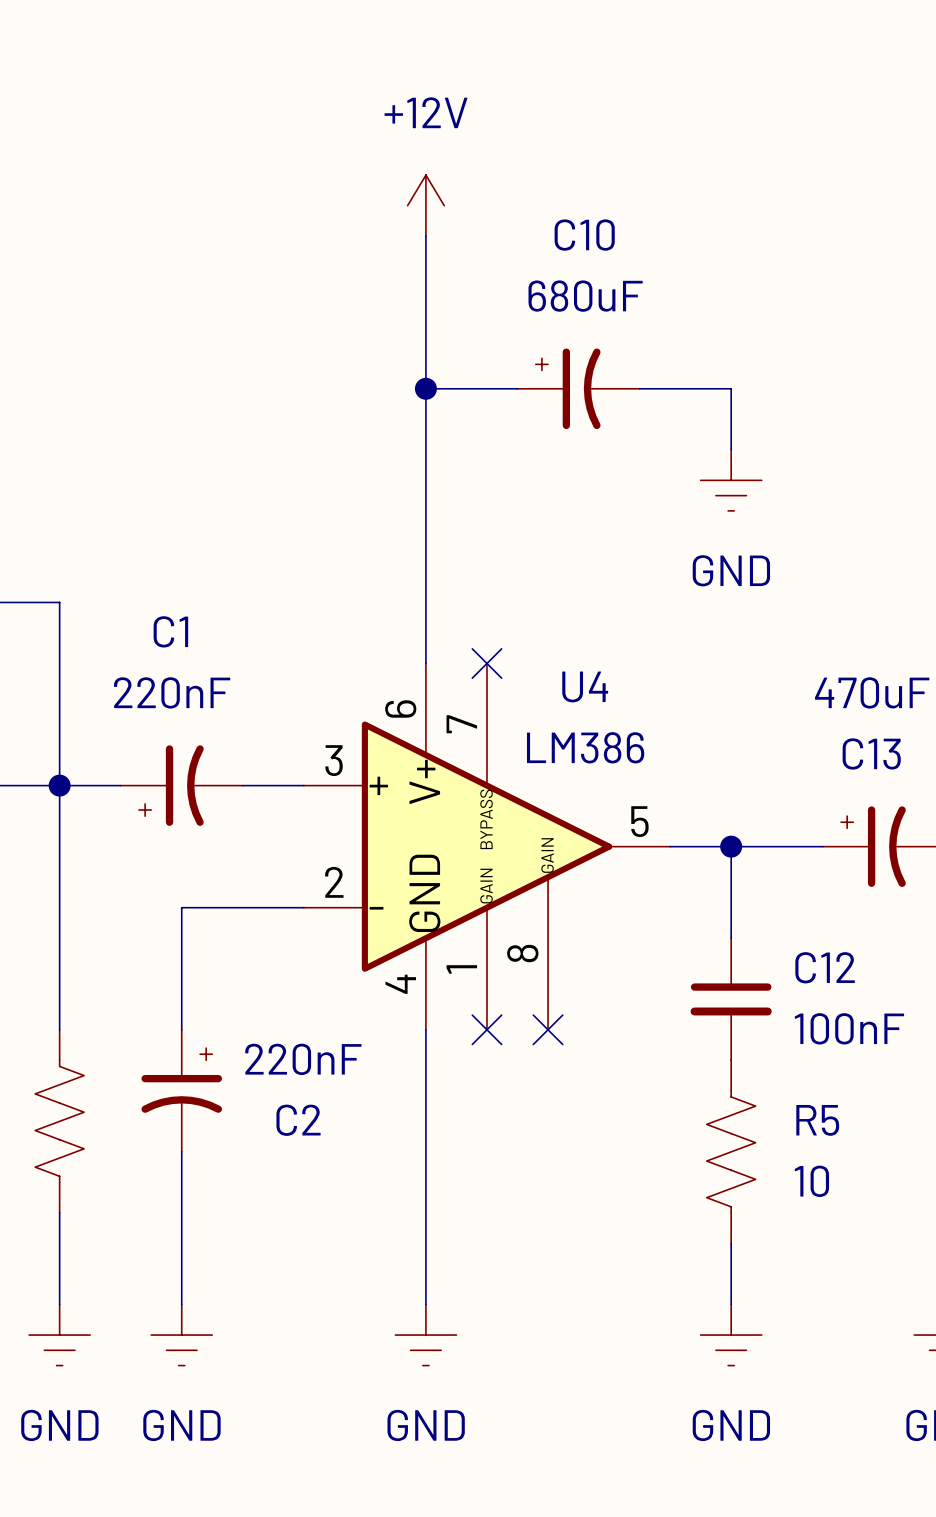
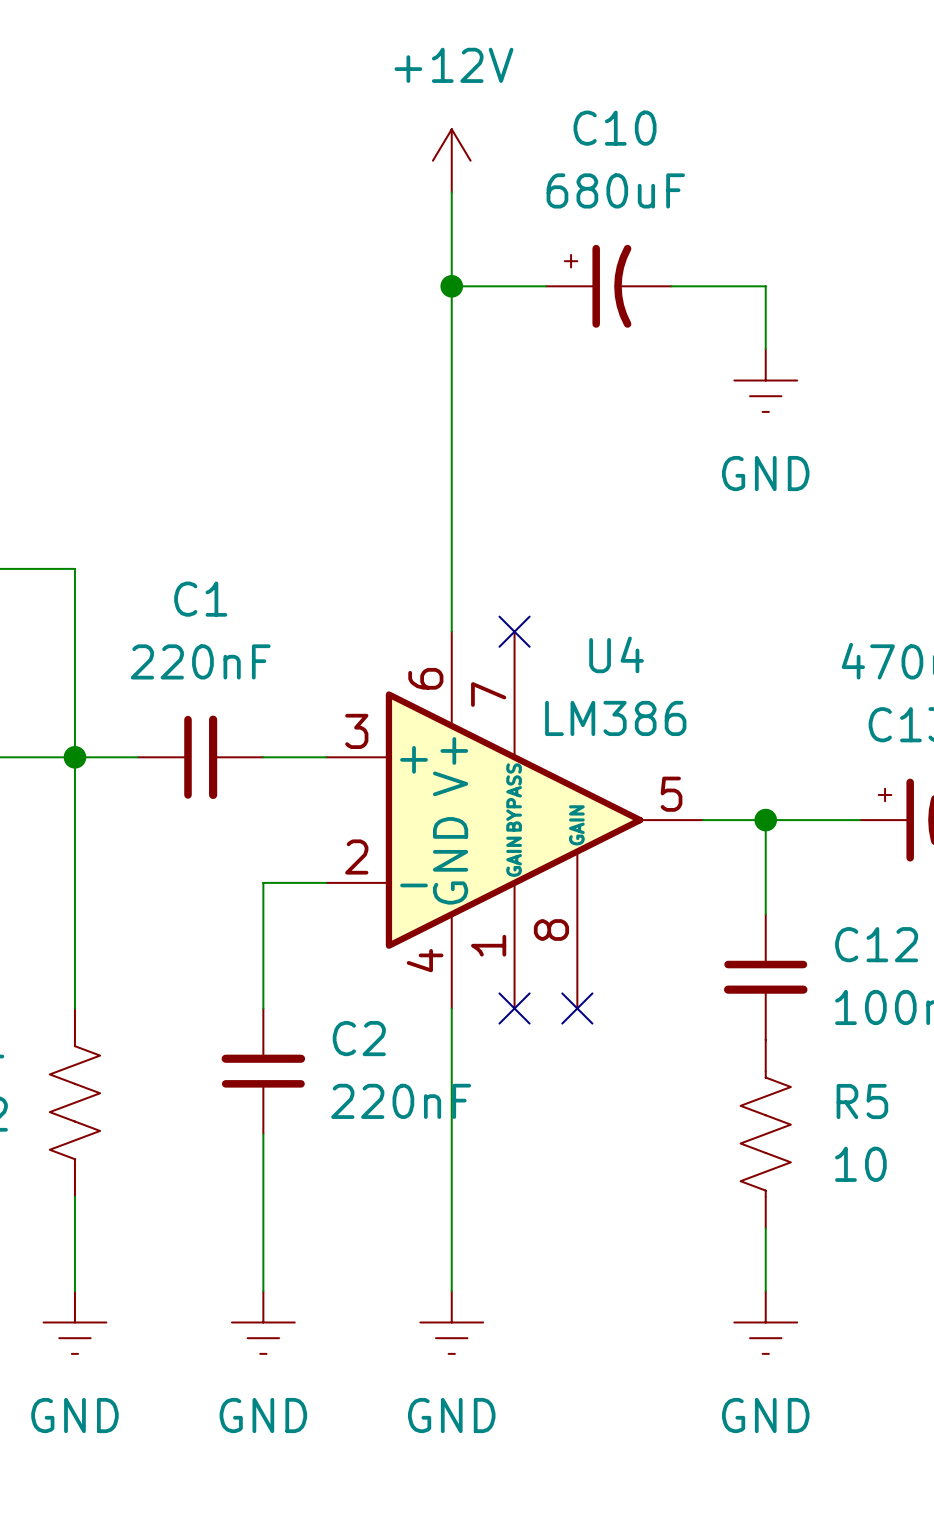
wire: (425, 388) (517, 388) -> (451, 286) (545, 286)
junction position: (425, 388) -> (451, 286)
C10 position: (578, 388) -> (608, 286)
wire: (639, 388) (731, 388) (731, 449) -> (671, 286) (765, 286) (765, 349)
power symbol position: GND (731, 480) -> GND (765, 380)
C1 symbol: [120, 745, 243, 826] -> [137, 715, 264, 800]
wire: (242, 907) (181, 907) (181, 1029) -> (263, 882) (263, 1008)
C2 symbol: [141, 1029, 223, 1152] -> [221, 1008, 306, 1135]
C2 value position: 220nF (303, 1059) -> 220nF (401, 1101)
C2 name position: C2 (298, 1120) -> C2 (359, 1038)
wire: (181, 1151) (181, 1304) -> (263, 1134) (263, 1291)
power symbol position: GND (181, 1335) -> GND (263, 1322)

